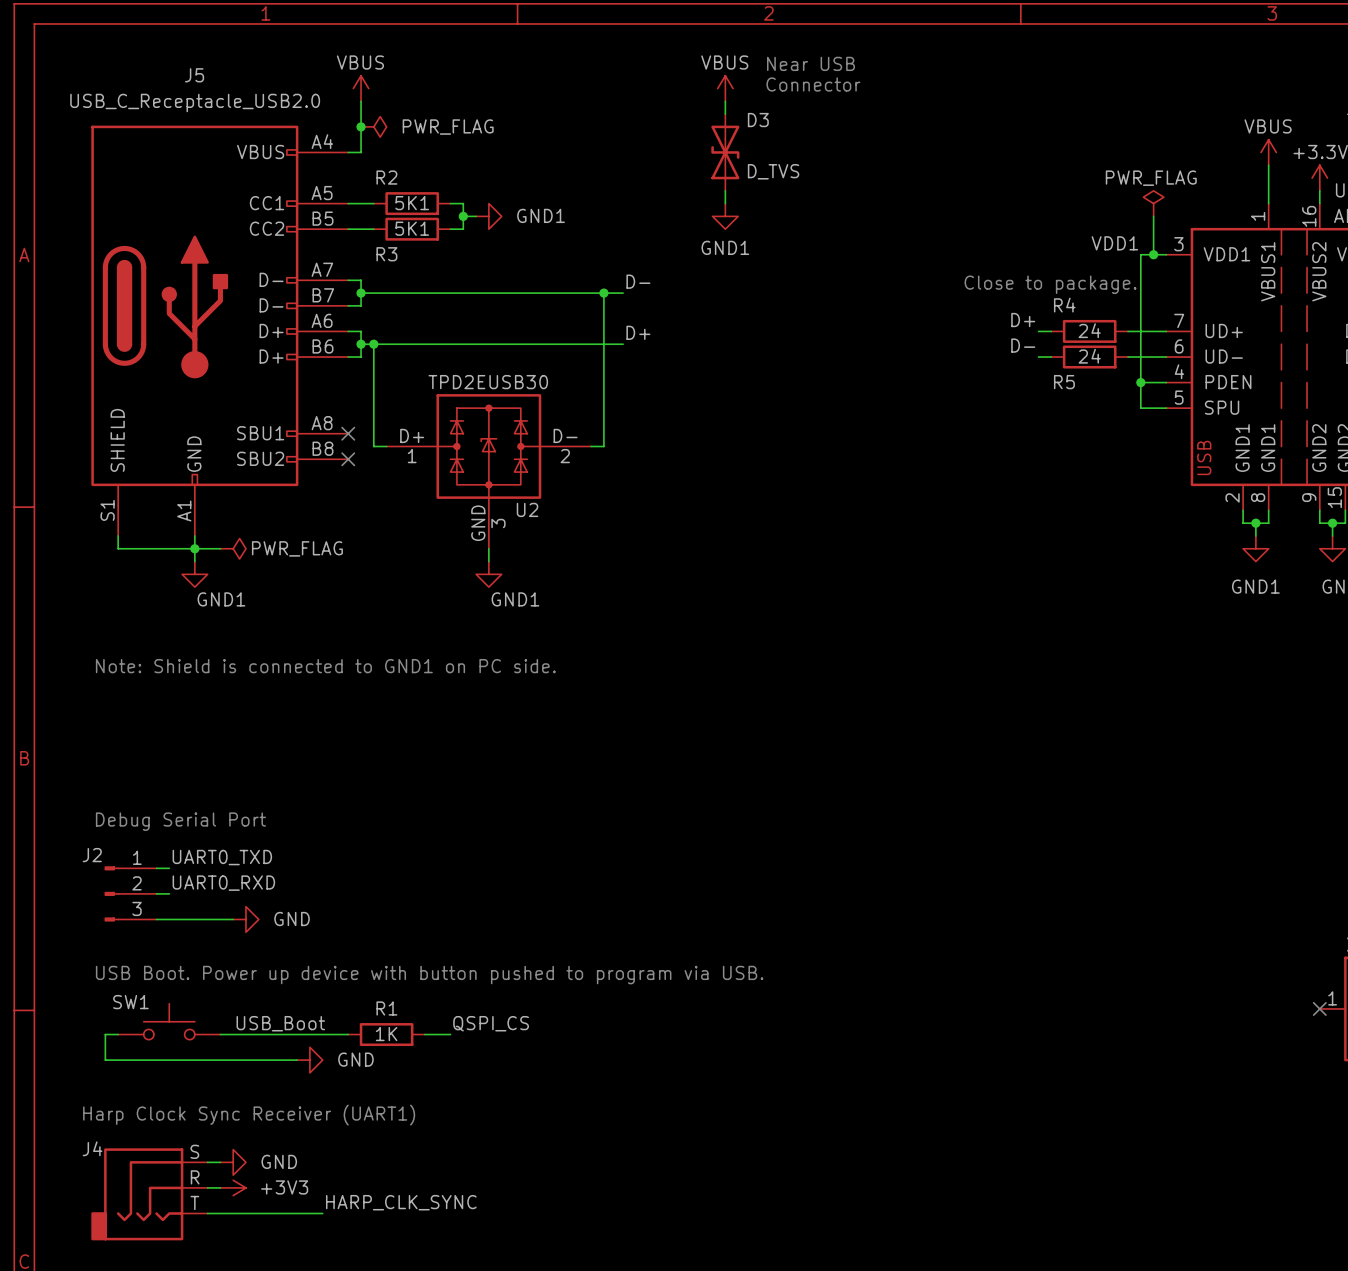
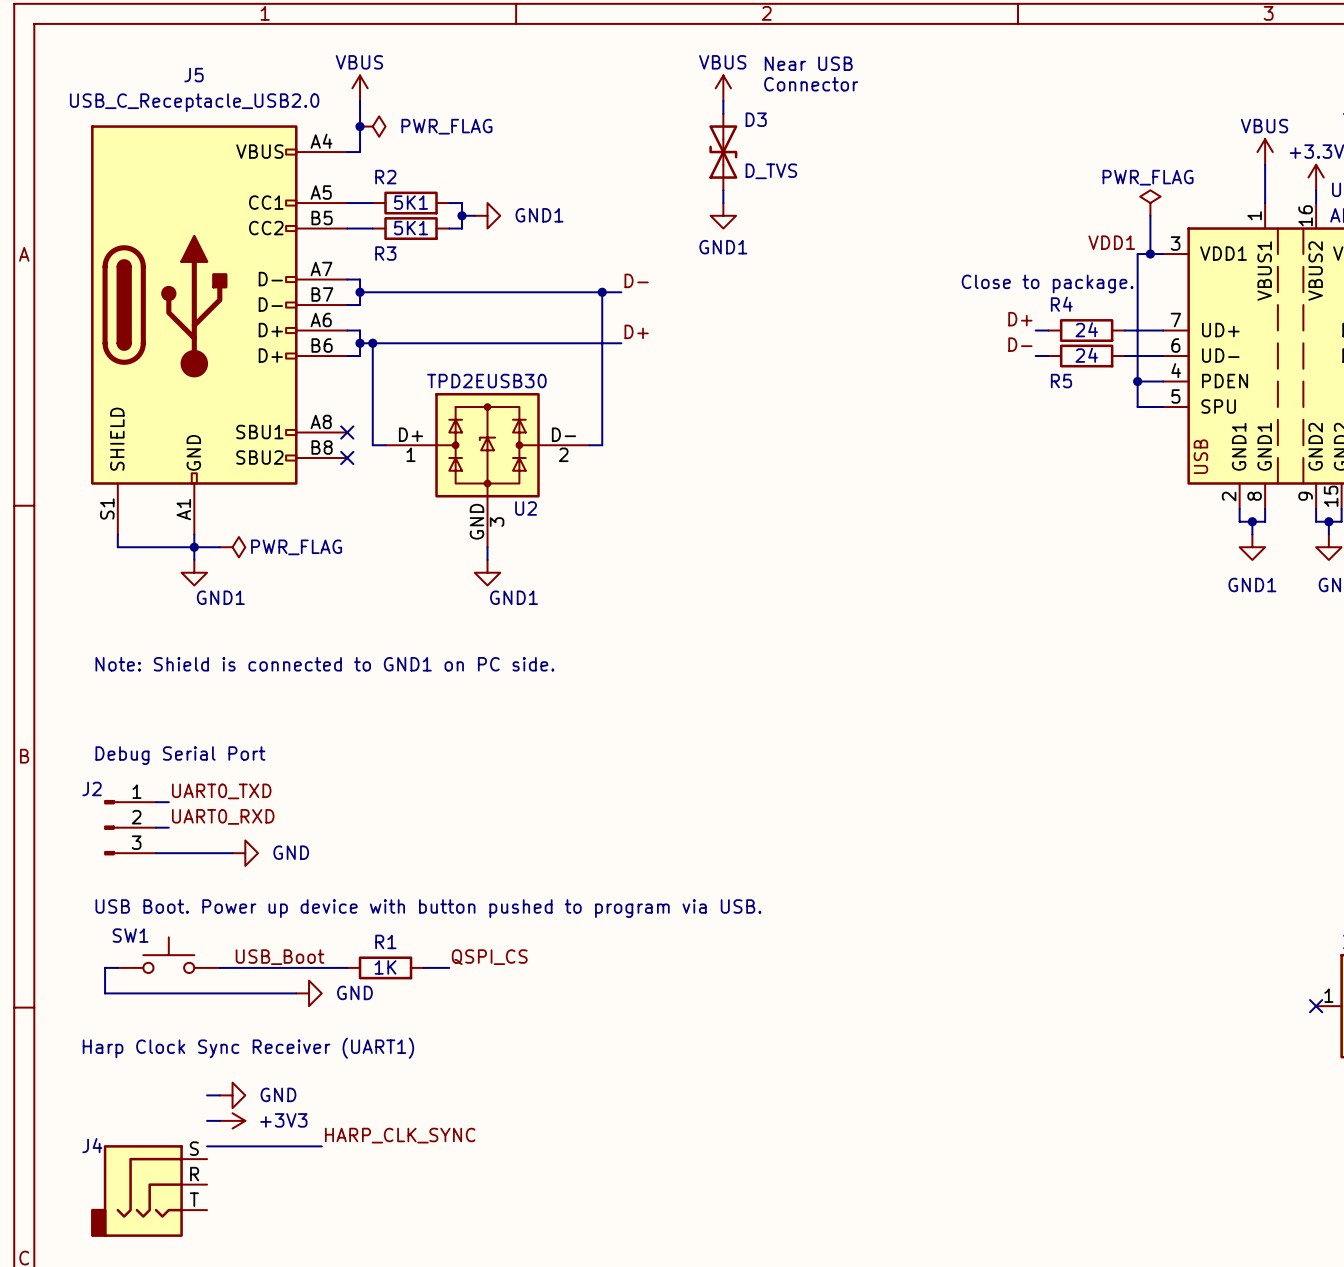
text position: Debug Serial Port (180, 821) -> Debug Serial Port (180, 755)
power symbol: none -> GND (245, 853)
label position: UART0_TXD (222, 857) -> UART0_TXD (221, 791)
wire: (156, 868) (169, 868) -> (156, 802) (168, 802)
label position: UART0_RXD (223, 883) -> UART0_RXD (223, 816)
J2 position: (130, 893) -> (130, 827)
wire: (156, 893) (169, 893) -> (156, 827) (168, 827)
wire: (156, 919) (233, 919) -> (156, 853) (232, 853)
power symbol: GND (245, 919) -> none
text position: USB Boot. Power up device with button pushed to program via USB. (429, 975) -> USB Boot. Power up device with button pushed to program via USB. (428, 908)
power symbol: none -> GND (309, 993)
SW1 position: (169, 1021) -> (168, 955)
label position: USB_Boot (280, 1023) -> USB_Boot (280, 957)
label position: QSPI_CS (491, 1023) -> QSPI_CS (489, 957)
wire: (118, 1034) (105, 1034) (105, 1060) (297, 1060) -> (117, 967) (105, 967) (105, 993) (296, 993)
wire: (220, 1034) (348, 1034) -> (219, 967) (347, 967)
R1 position: (386, 1034) -> (385, 967)
wire: (424, 1034) (450, 1034) -> (423, 967) (449, 967)
power symbol: GND (309, 1060) -> none
power symbol: none -> GND (232, 1095)
text position: Harp Clock Sync Receiver (UART1) (249, 1115) -> Harp Clock Sync Receiver (UART1) (248, 1048)
wire: (207, 1162) (220, 1162) -> (207, 1095) (219, 1095)
power symbol: GND (233, 1162) -> none
wire: (207, 1187) (220, 1187) -> (207, 1120) (219, 1120)
power symbol position: +3V3 (233, 1187) -> +3V3 (232, 1120)
label position: HARP_CLK_SYNC (401, 1202) -> HARP_CLK_SYNC (400, 1135)
wire: (207, 1213) (322, 1213) -> (207, 1146) (321, 1146)

